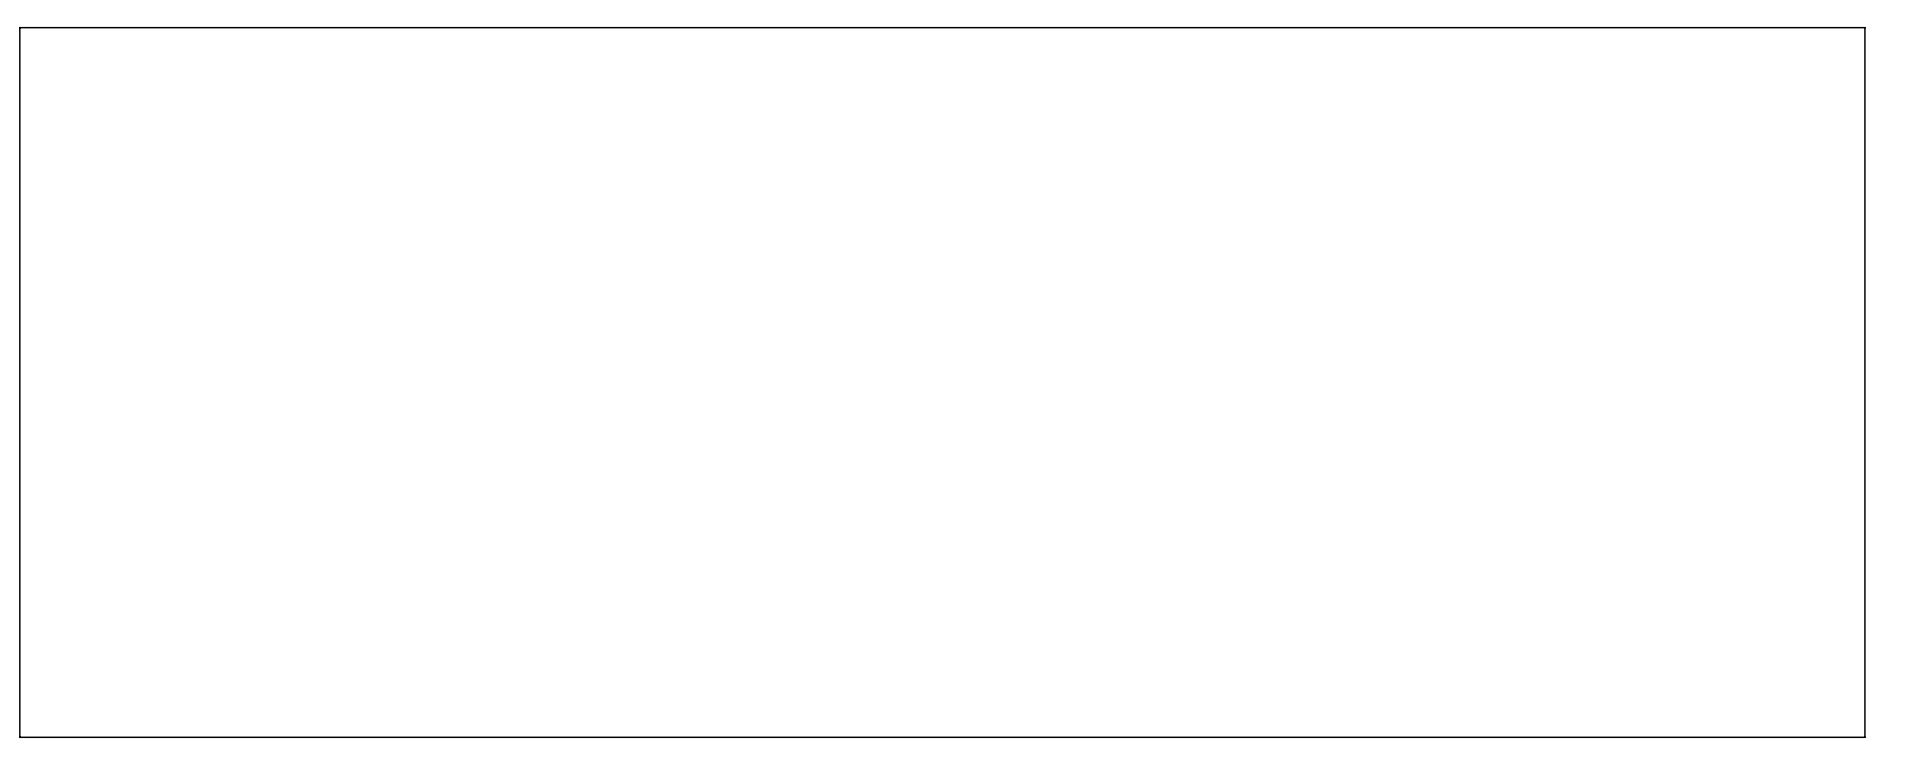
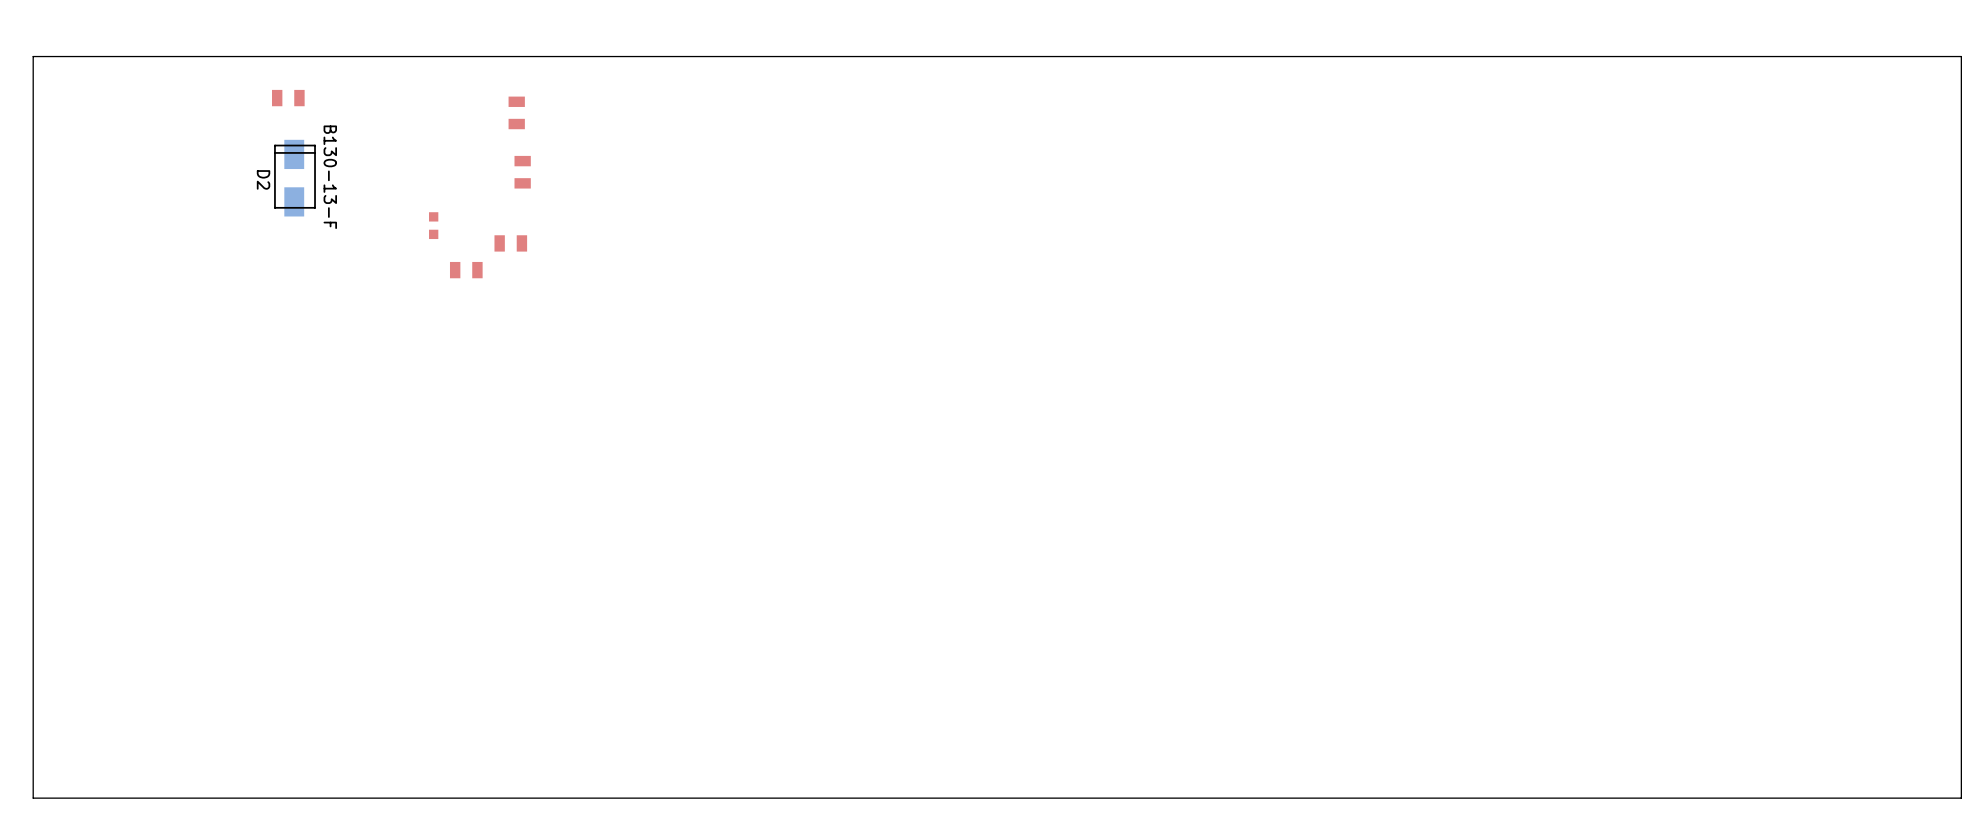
part: none -> (288, 98)
part: none -> (516, 112)
part: none -> (522, 172)
D2: none -> B130-13-F (294, 178)
part: none -> (433, 225)
part: none -> (510, 243)
part: none -> (466, 270)

